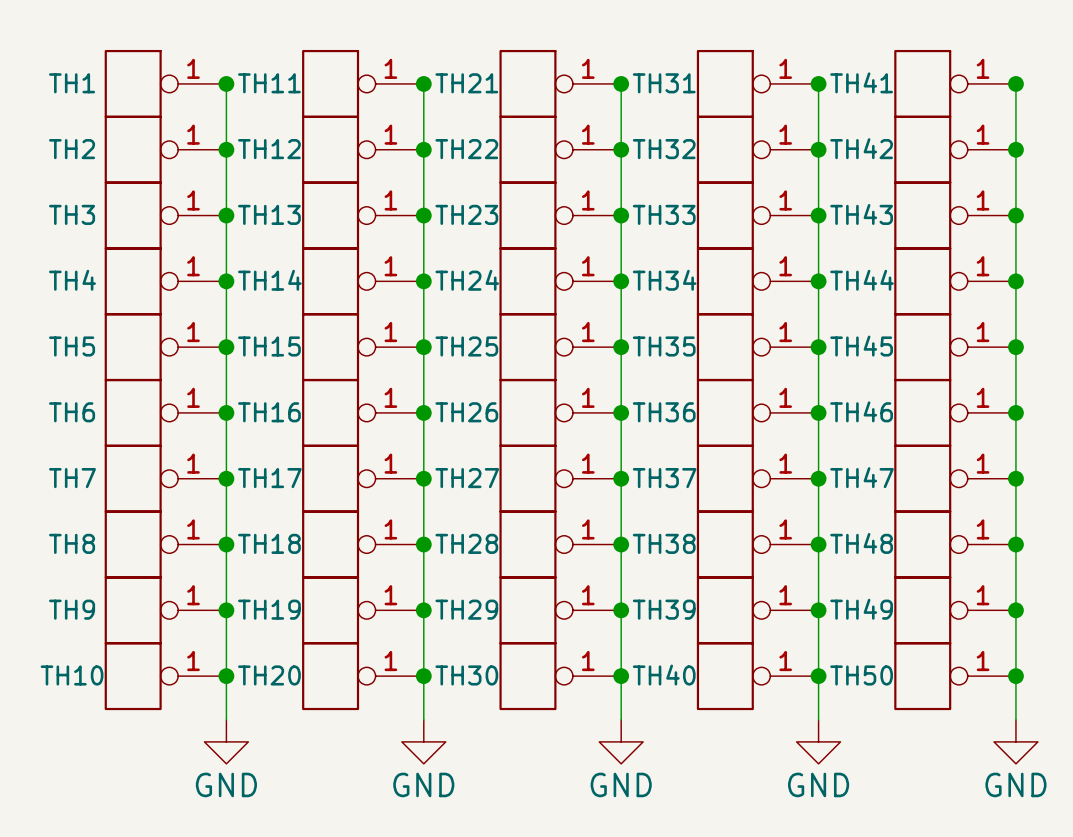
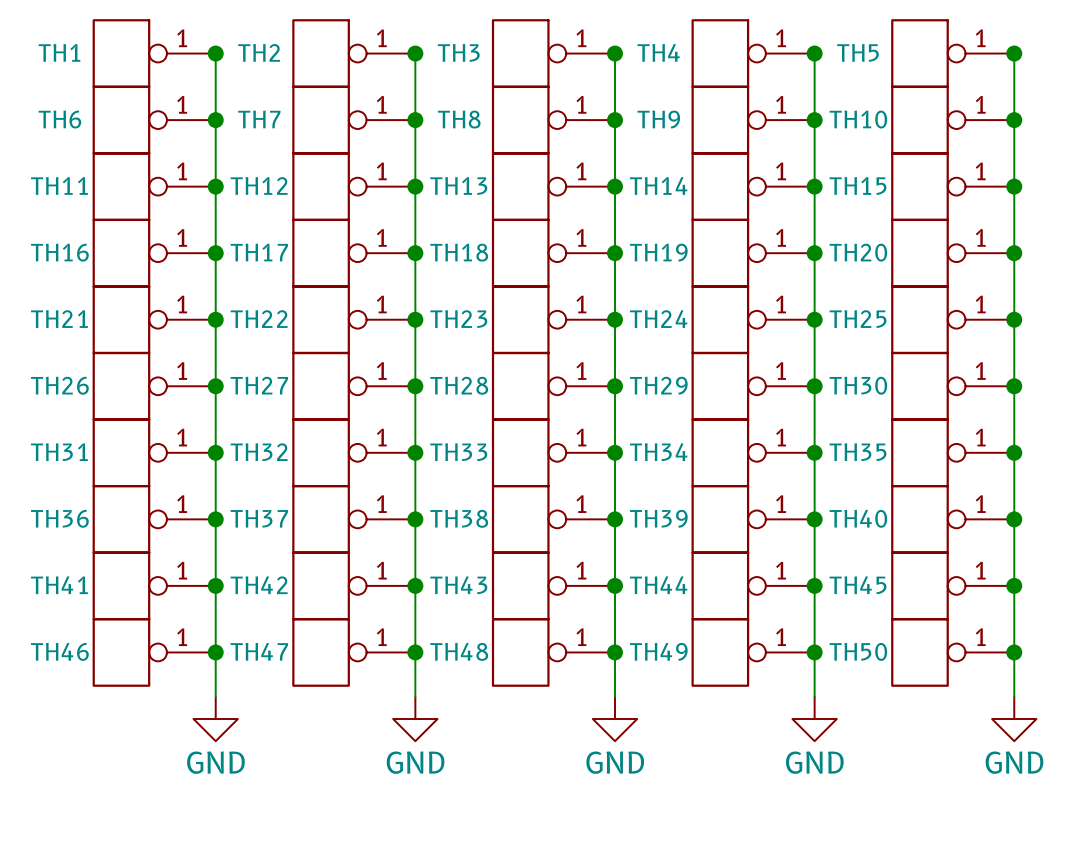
TH41 name: TH41 (861, 82) -> TH5 (857, 52)
TH11 name: TH11 (269, 83) -> TH2 (259, 52)
TH21 name: TH21 (466, 83) -> TH3 (458, 52)
TH31 name: TH31 (664, 83) -> TH4 (658, 52)
TH42 name: TH42 (861, 148) -> TH10 (858, 119)
TH2 name: TH2 (72, 149) -> TH6 (59, 119)
TH12 name: TH12 (269, 149) -> TH7 (259, 119)
TH22 name: TH22 (466, 149) -> TH8 (459, 119)
TH32 name: TH32 (664, 149) -> TH9 (658, 119)
TH3 name: TH3 (72, 214) -> TH11 (59, 185)
TH13 name: TH13 (269, 214) -> TH12 (259, 185)
TH23 name: TH23 (466, 214) -> TH13 (458, 185)
TH33 name: TH33 (664, 214) -> TH14 (658, 185)
TH43 name: TH43 (861, 214) -> TH15 (857, 185)
TH4 name: TH4 (72, 280) -> TH16 (59, 252)
TH14 name: TH14 (269, 280) -> TH17 (259, 252)
TH24 name: TH24 (467, 280) -> TH18 (459, 252)
TH34 name: TH34 (664, 280) -> TH19 (658, 252)
TH44 name: TH44 (862, 280) -> TH20 (858, 252)
TH5 name: TH5 (72, 346) -> TH21 (59, 319)
TH15 name: TH15 (269, 346) -> TH22 (259, 319)
TH25 name: TH25 (466, 346) -> TH23 (458, 319)
TH35 name: TH35 (664, 346) -> TH24 (658, 319)
TH45 name: TH45 (861, 346) -> TH25 (857, 319)
TH46 name: TH46 (861, 411) -> TH30 (858, 385)
TH6 name: TH6 (72, 412) -> TH26 (59, 385)
TH16 name: TH16 (269, 412) -> TH27 (259, 385)
TH26 name: TH26 (466, 412) -> TH28 (459, 385)
TH36 name: TH36 (664, 412) -> TH29 (658, 385)
TH47 name: TH47 (862, 477) -> TH35 (857, 452)
TH7 name: TH7 (72, 478) -> TH31 (59, 452)
TH17 name: TH17 (269, 478) -> TH32 (259, 452)
TH27 name: TH27 (467, 478) -> TH33 (458, 452)
TH37 name: TH37 (664, 478) -> TH34 (658, 452)
TH8 name: TH8 (72, 543) -> TH36 (59, 518)
TH18 name: TH18 (269, 543) -> TH37 (259, 518)
TH28 name: TH28 (466, 543) -> TH38 (459, 518)
TH38 name: TH38 (664, 543) -> TH39 (658, 518)
TH48 name: TH48 (861, 543) -> TH40 (858, 518)
TH9 name: TH9 (72, 609) -> TH41 (59, 585)
TH19 name: TH19 (269, 609) -> TH42 (259, 585)
TH29 name: TH29 (466, 609) -> TH43 (458, 585)
TH39 name: TH39 (664, 609) -> TH44 (658, 585)
TH49 name: TH49 (861, 609) -> TH45 (857, 585)
TH10 name: TH10 (72, 675) -> TH46 (59, 651)
TH20 name: TH20 (269, 675) -> TH47 (259, 651)
TH30 name: TH30 (466, 675) -> TH48 (459, 651)
TH40 name: TH40 (664, 675) -> TH49 (658, 651)

